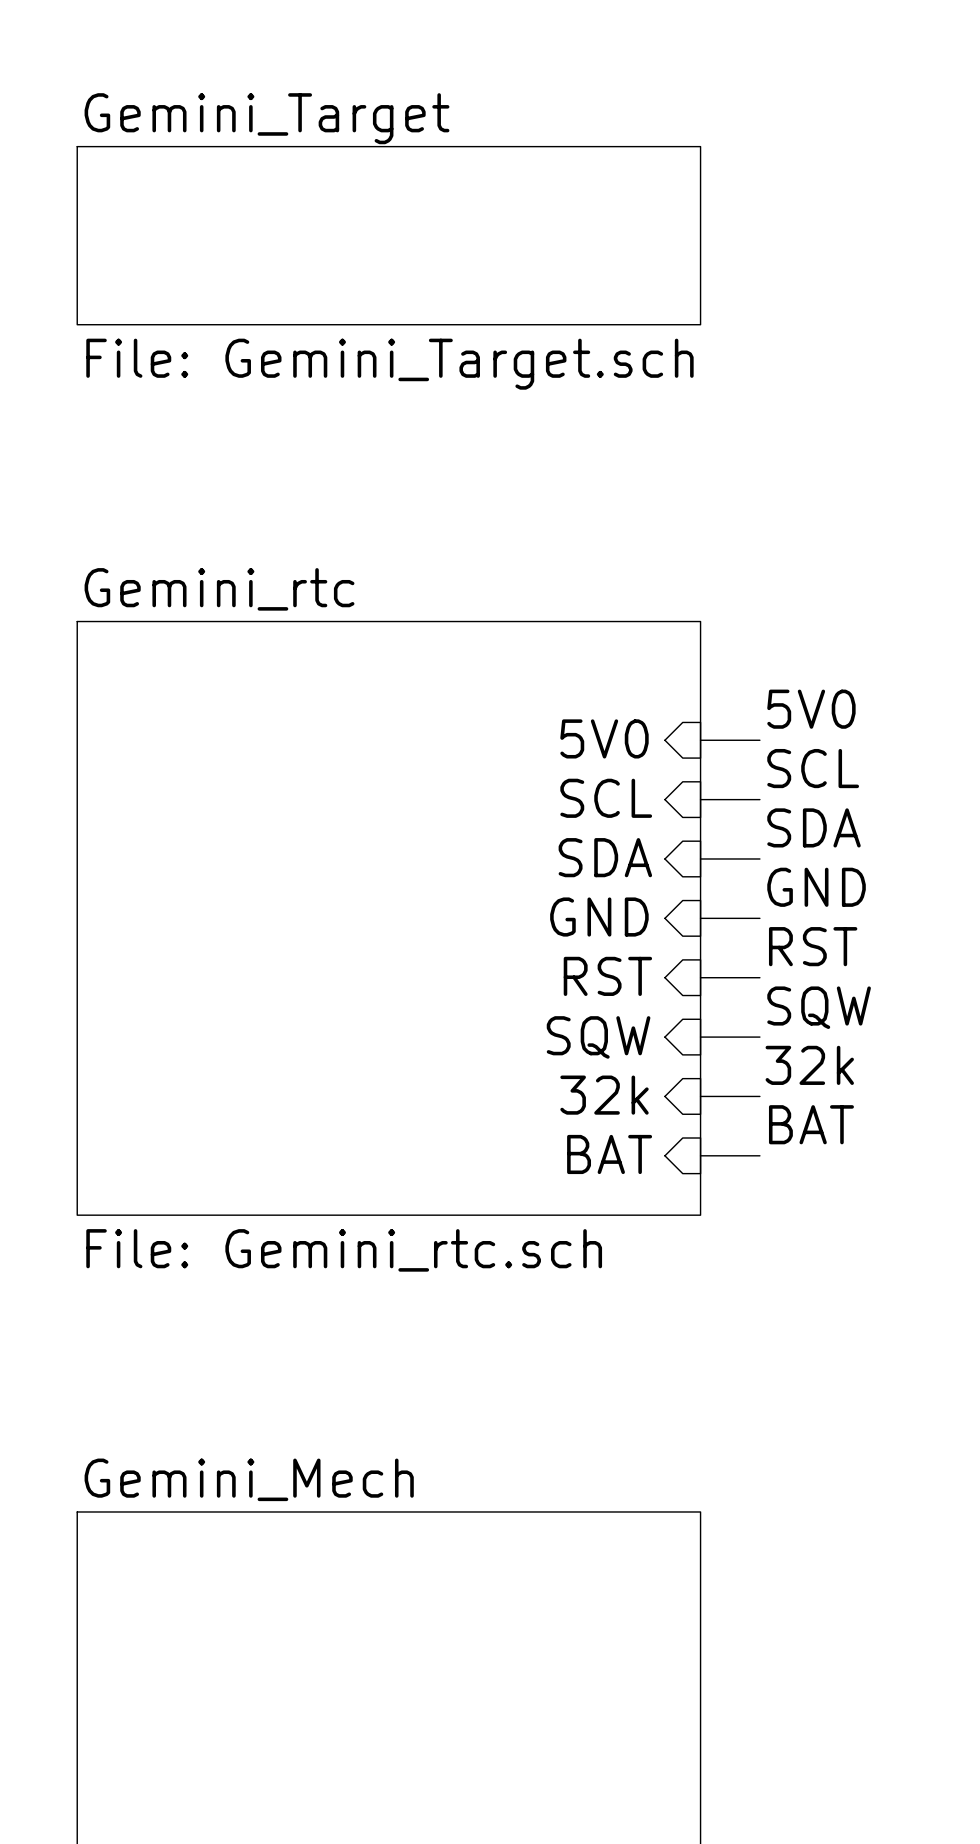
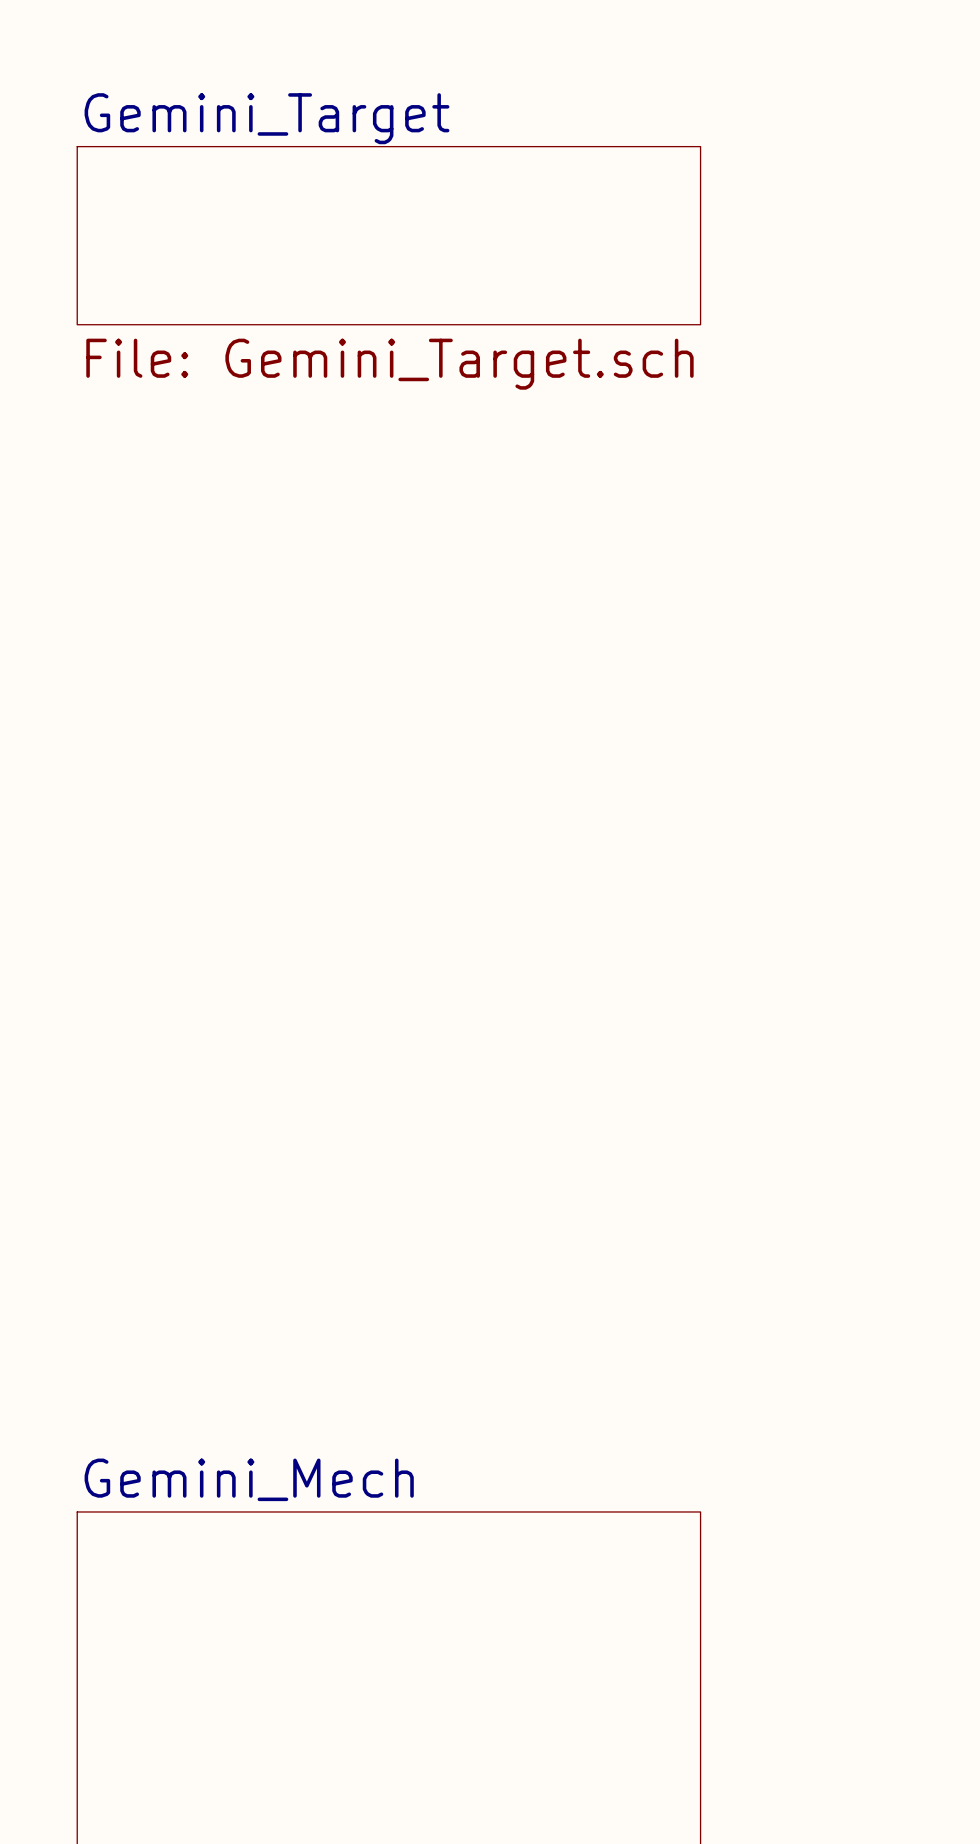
label: 5V0 (811, 709) -> none
sheet pin: 5V0 (604, 738) -> none
wire: (700, 740) (759, 740) -> none
label: SCL (813, 768) -> none
sheet pin: SCL (606, 798) -> none
wire: (700, 799) (759, 799) -> none
label: SDA (813, 827) -> none
sheet pin: SDA (605, 857) -> none
wire: (700, 858) (759, 858) -> none
label: GND (816, 887) -> none
sheet pin: GND (599, 917) -> none
sheet Gemini_rtc: File: Gemini_rtc.sch (388, 918) -> none
wire: (700, 918) (759, 918) -> none
label: RST (813, 946) -> none
sheet pin: RST (607, 976) -> none
wire: (700, 977) (759, 977) -> none
label: SQW (819, 1007) -> none
sheet pin: SQW (598, 1037) -> none
wire: (700, 1037) (759, 1037) -> none
label: 32k (809, 1065) -> none
sheet pin: 32k (604, 1095) -> none
wire: (700, 1096) (759, 1096) -> none
label: BAT (811, 1124) -> none
sheet pin: BAT (609, 1154) -> none
wire: (700, 1155) (759, 1155) -> none

